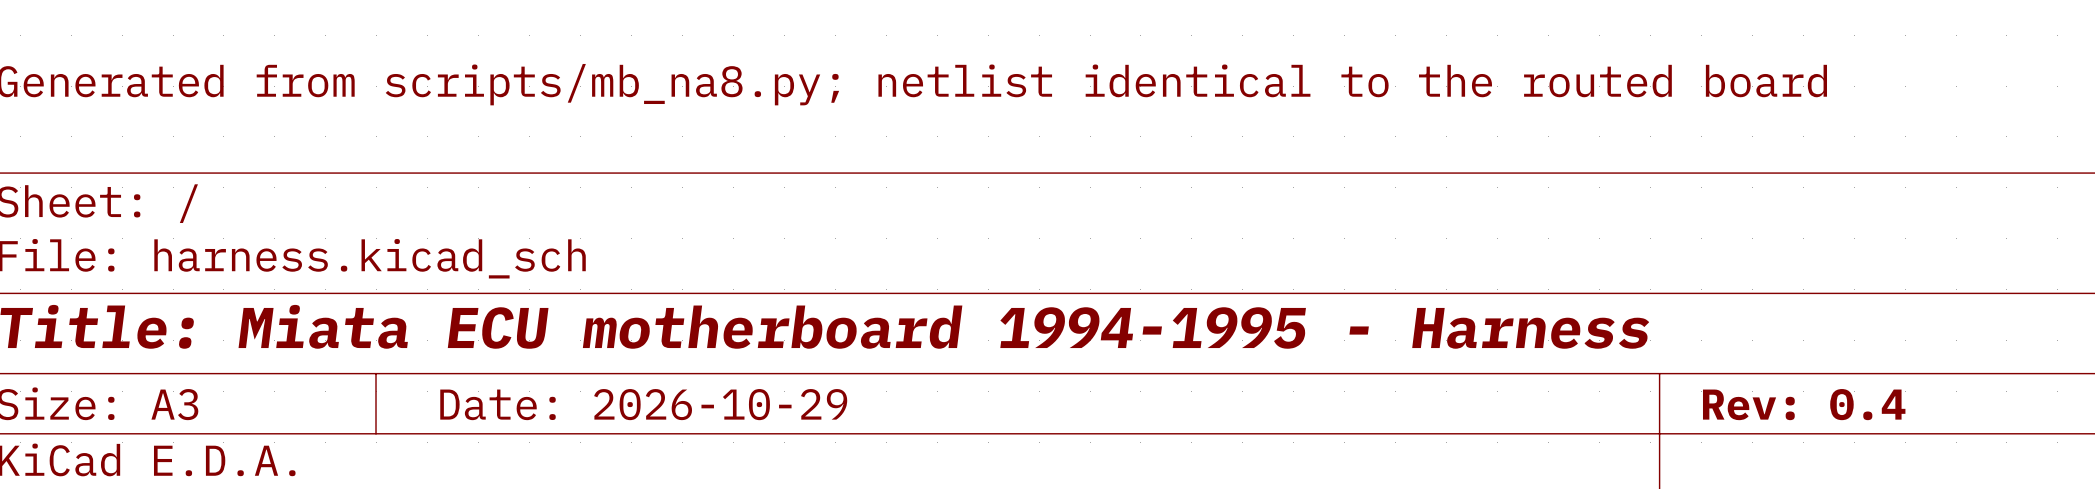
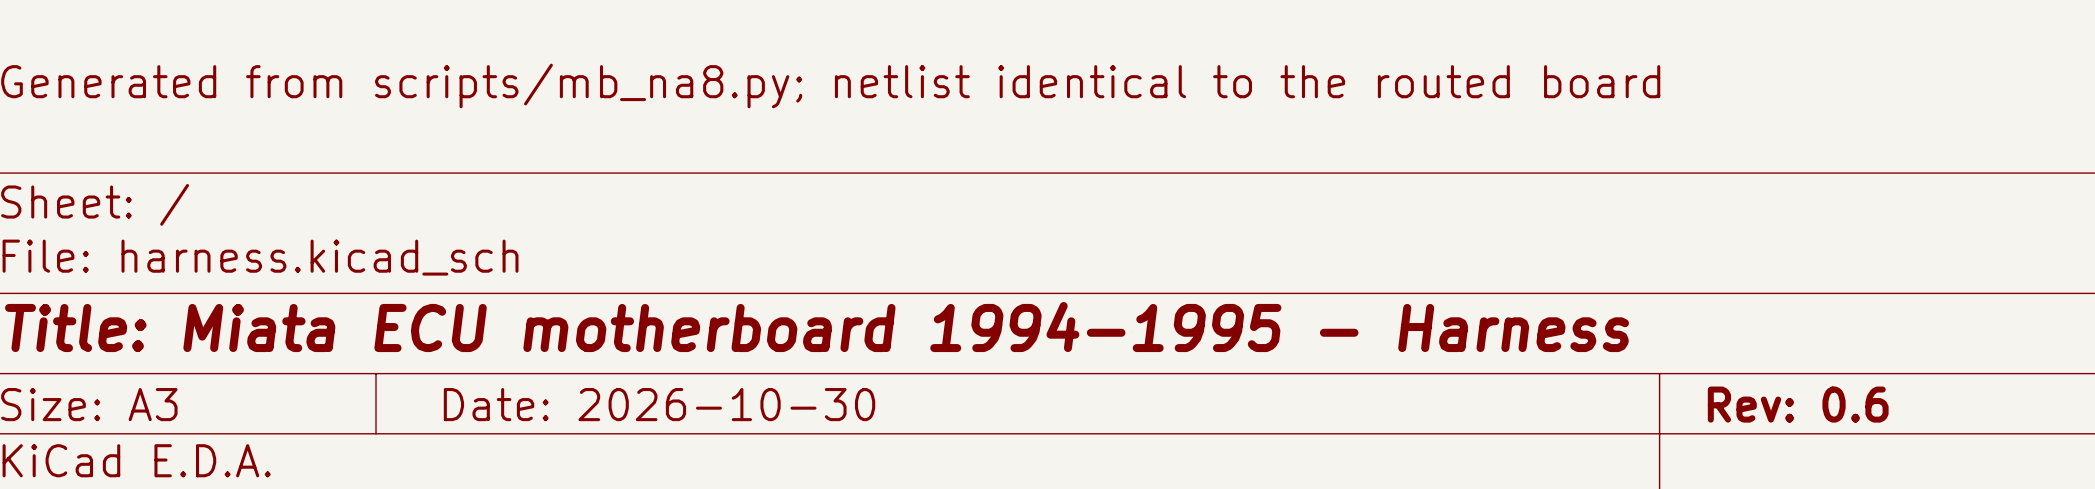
title block: Date: 2026-10-29 (643, 404) -> Date: 2026-10-30 (659, 404)
title block: Rev: 0.4 (1804, 404) -> Rev: 0.6 (1798, 404)

